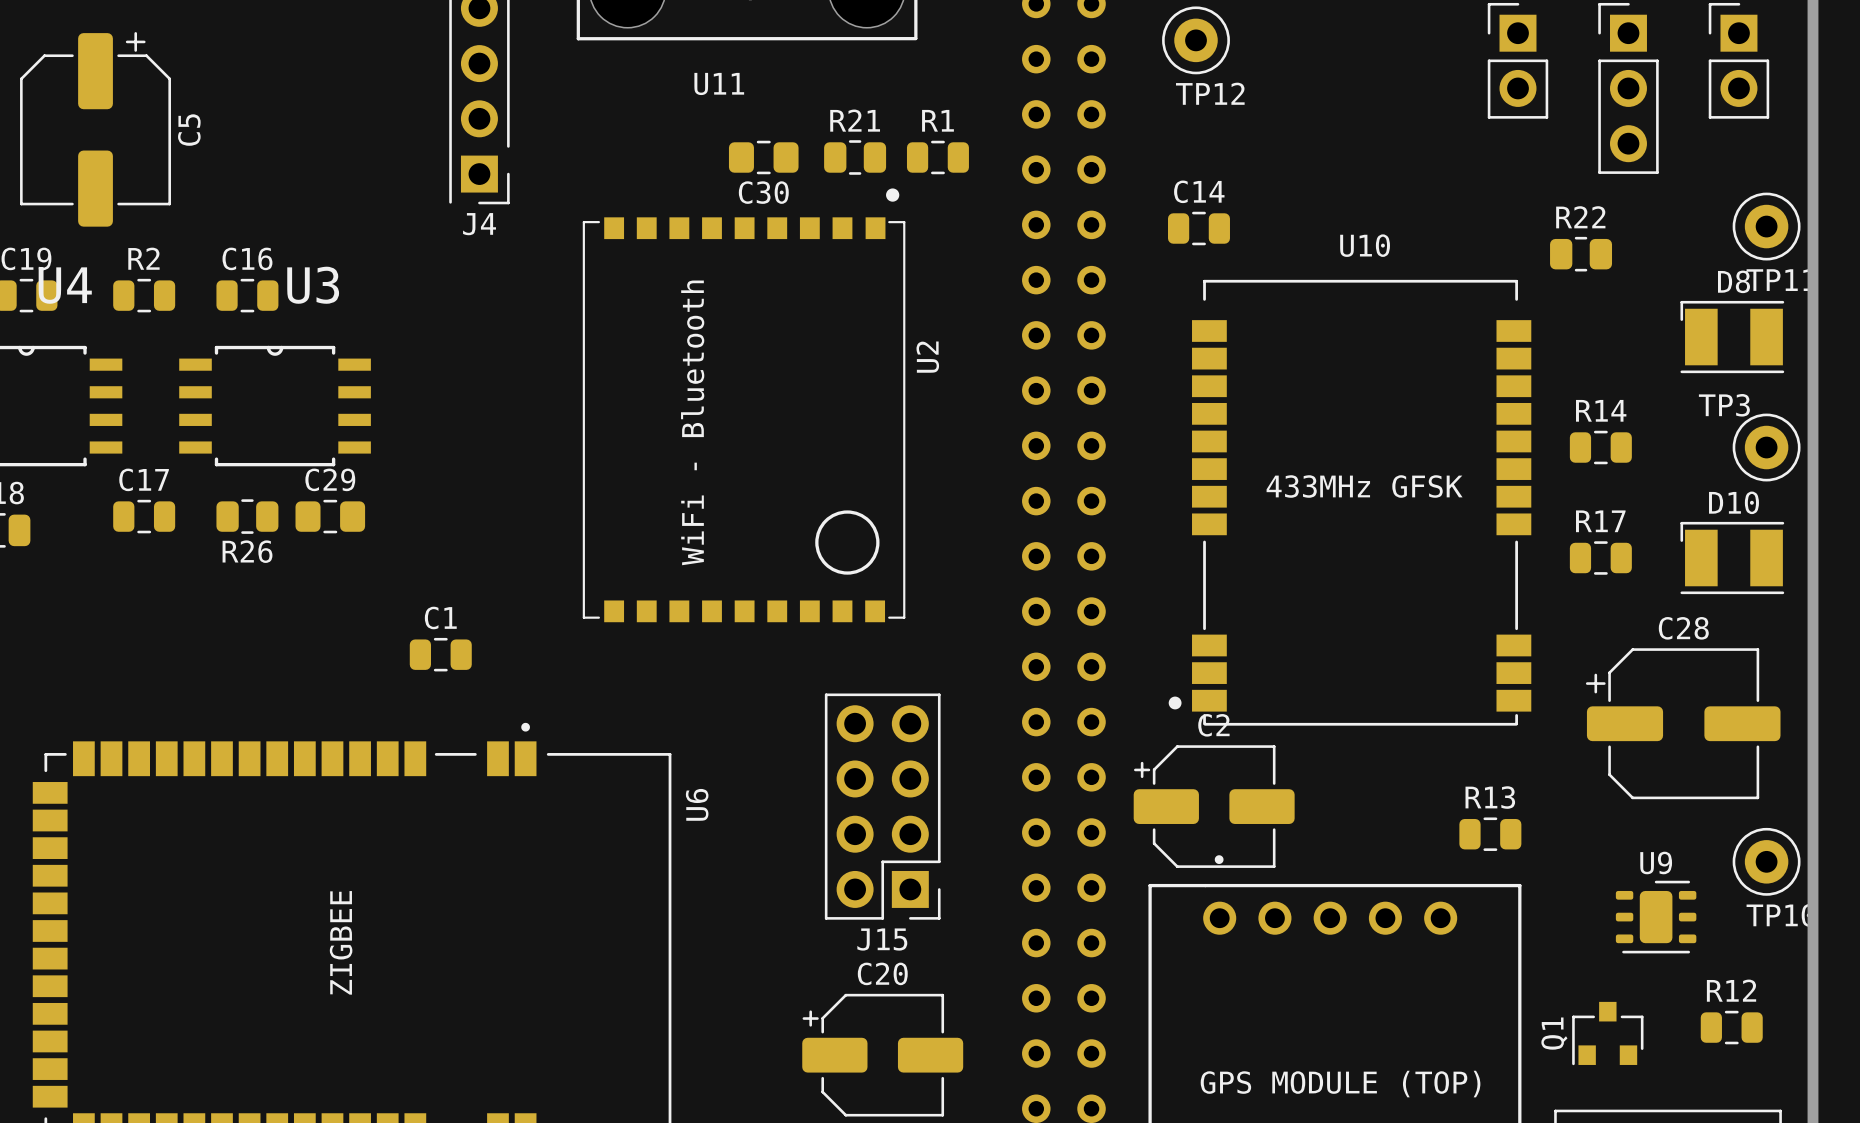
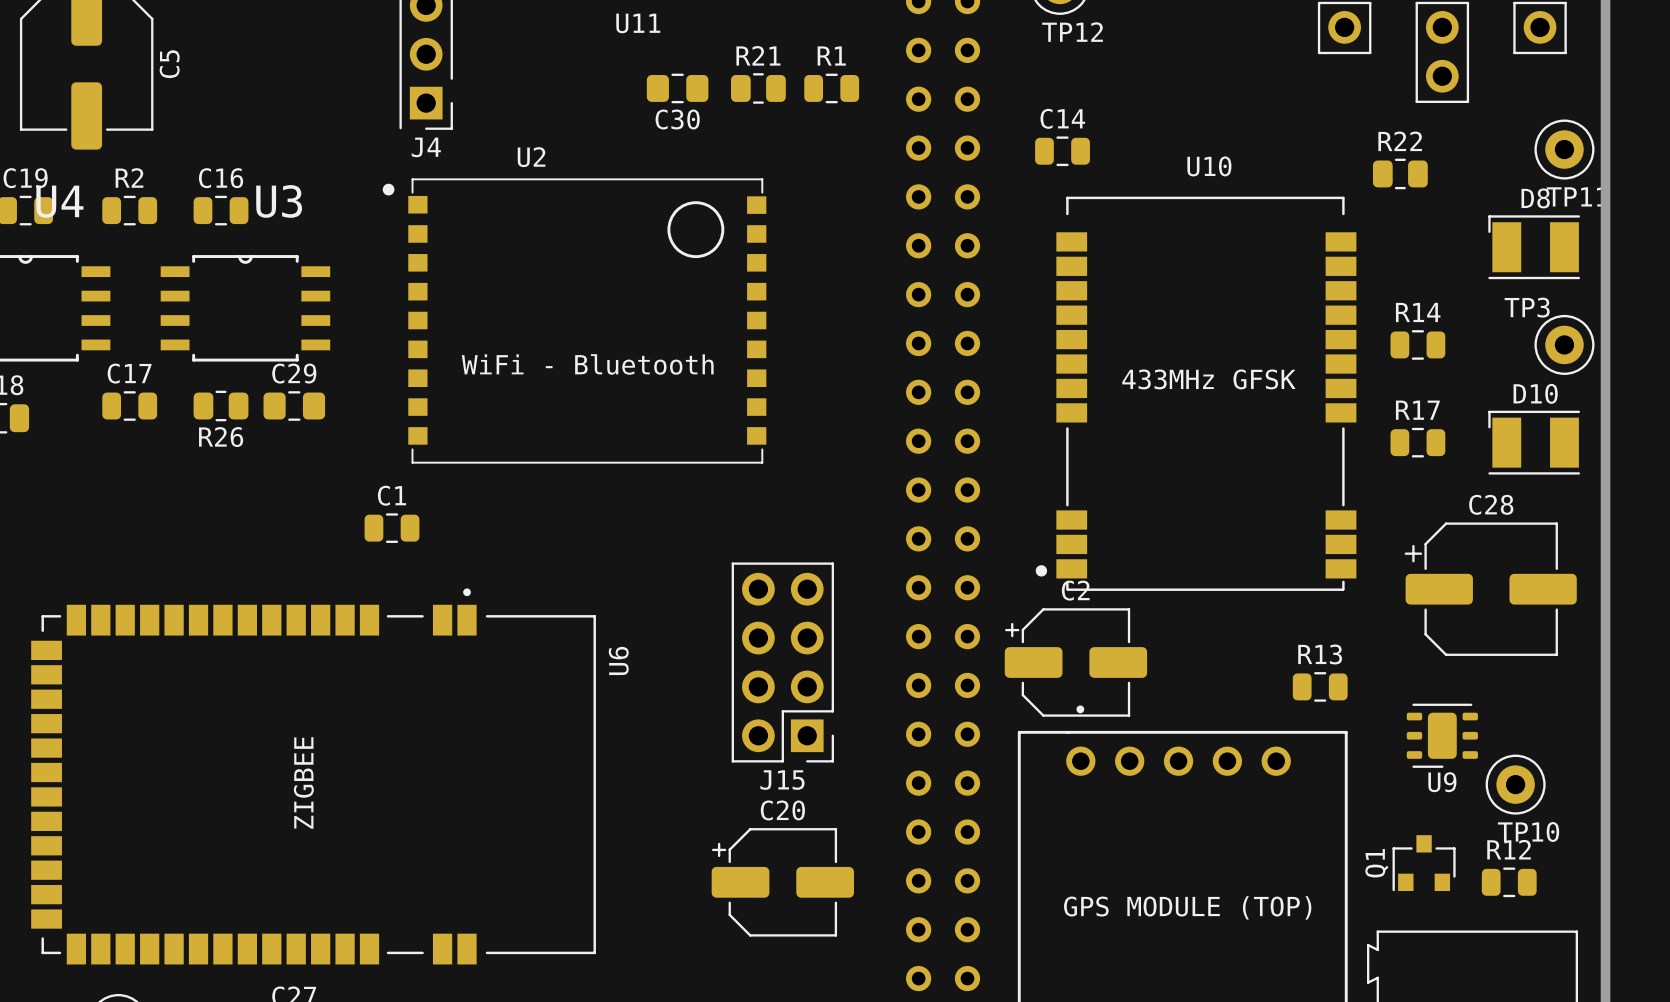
U2 rotation: 0° (744, 405) -> 90° counterclockwise (574, 321)
TP10 position: (1766, 861) -> (1515, 784)
U9 rotation: 0° (1656, 917) -> 180° (1442, 735)
R12 position: (1731, 1027) -> (1509, 882)

